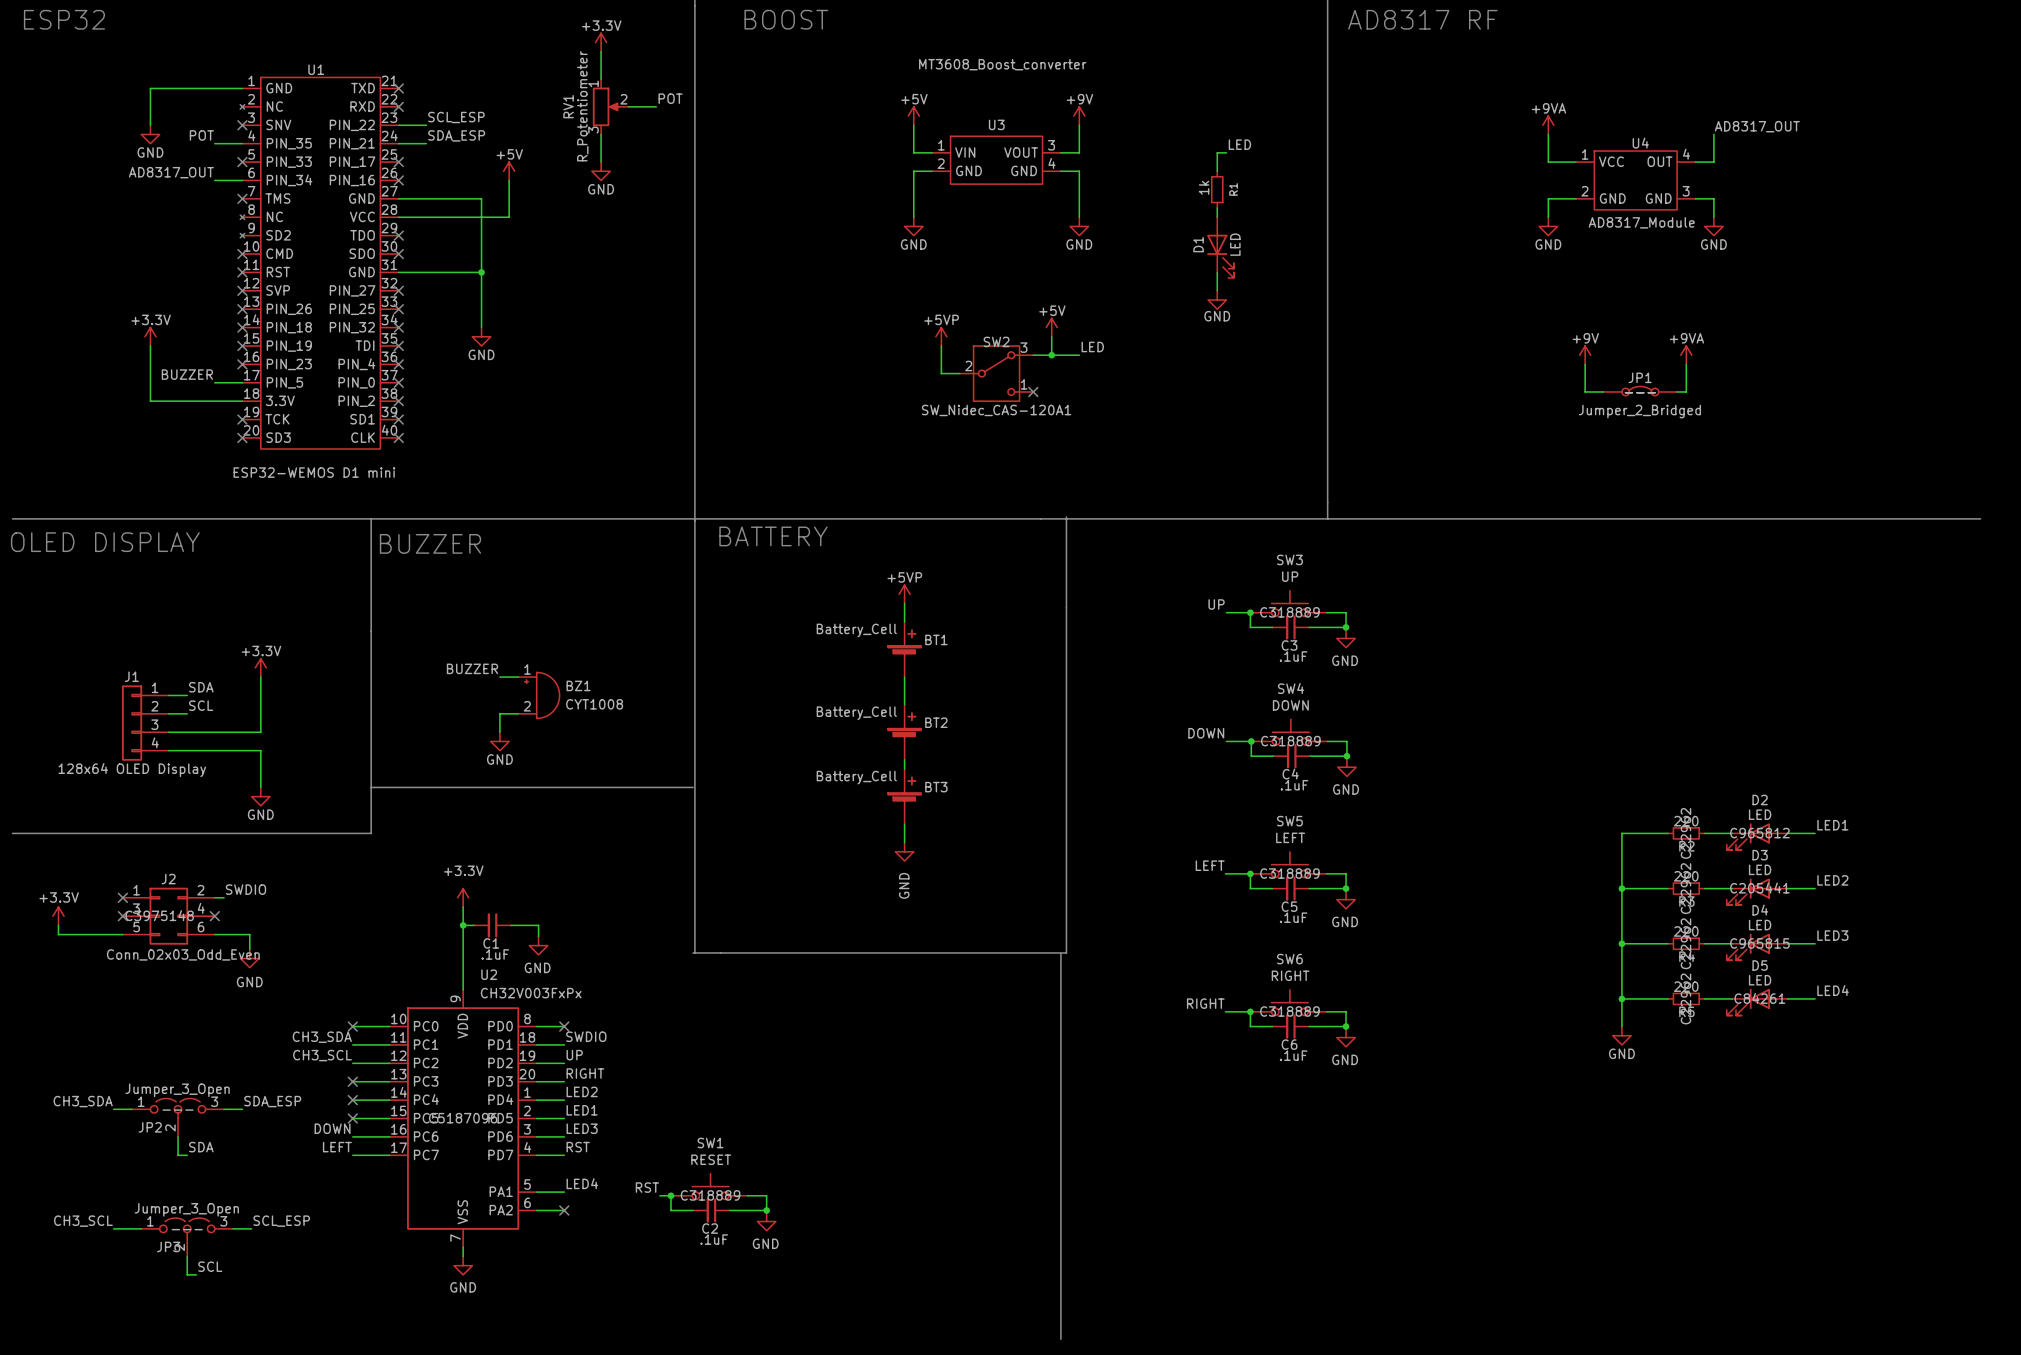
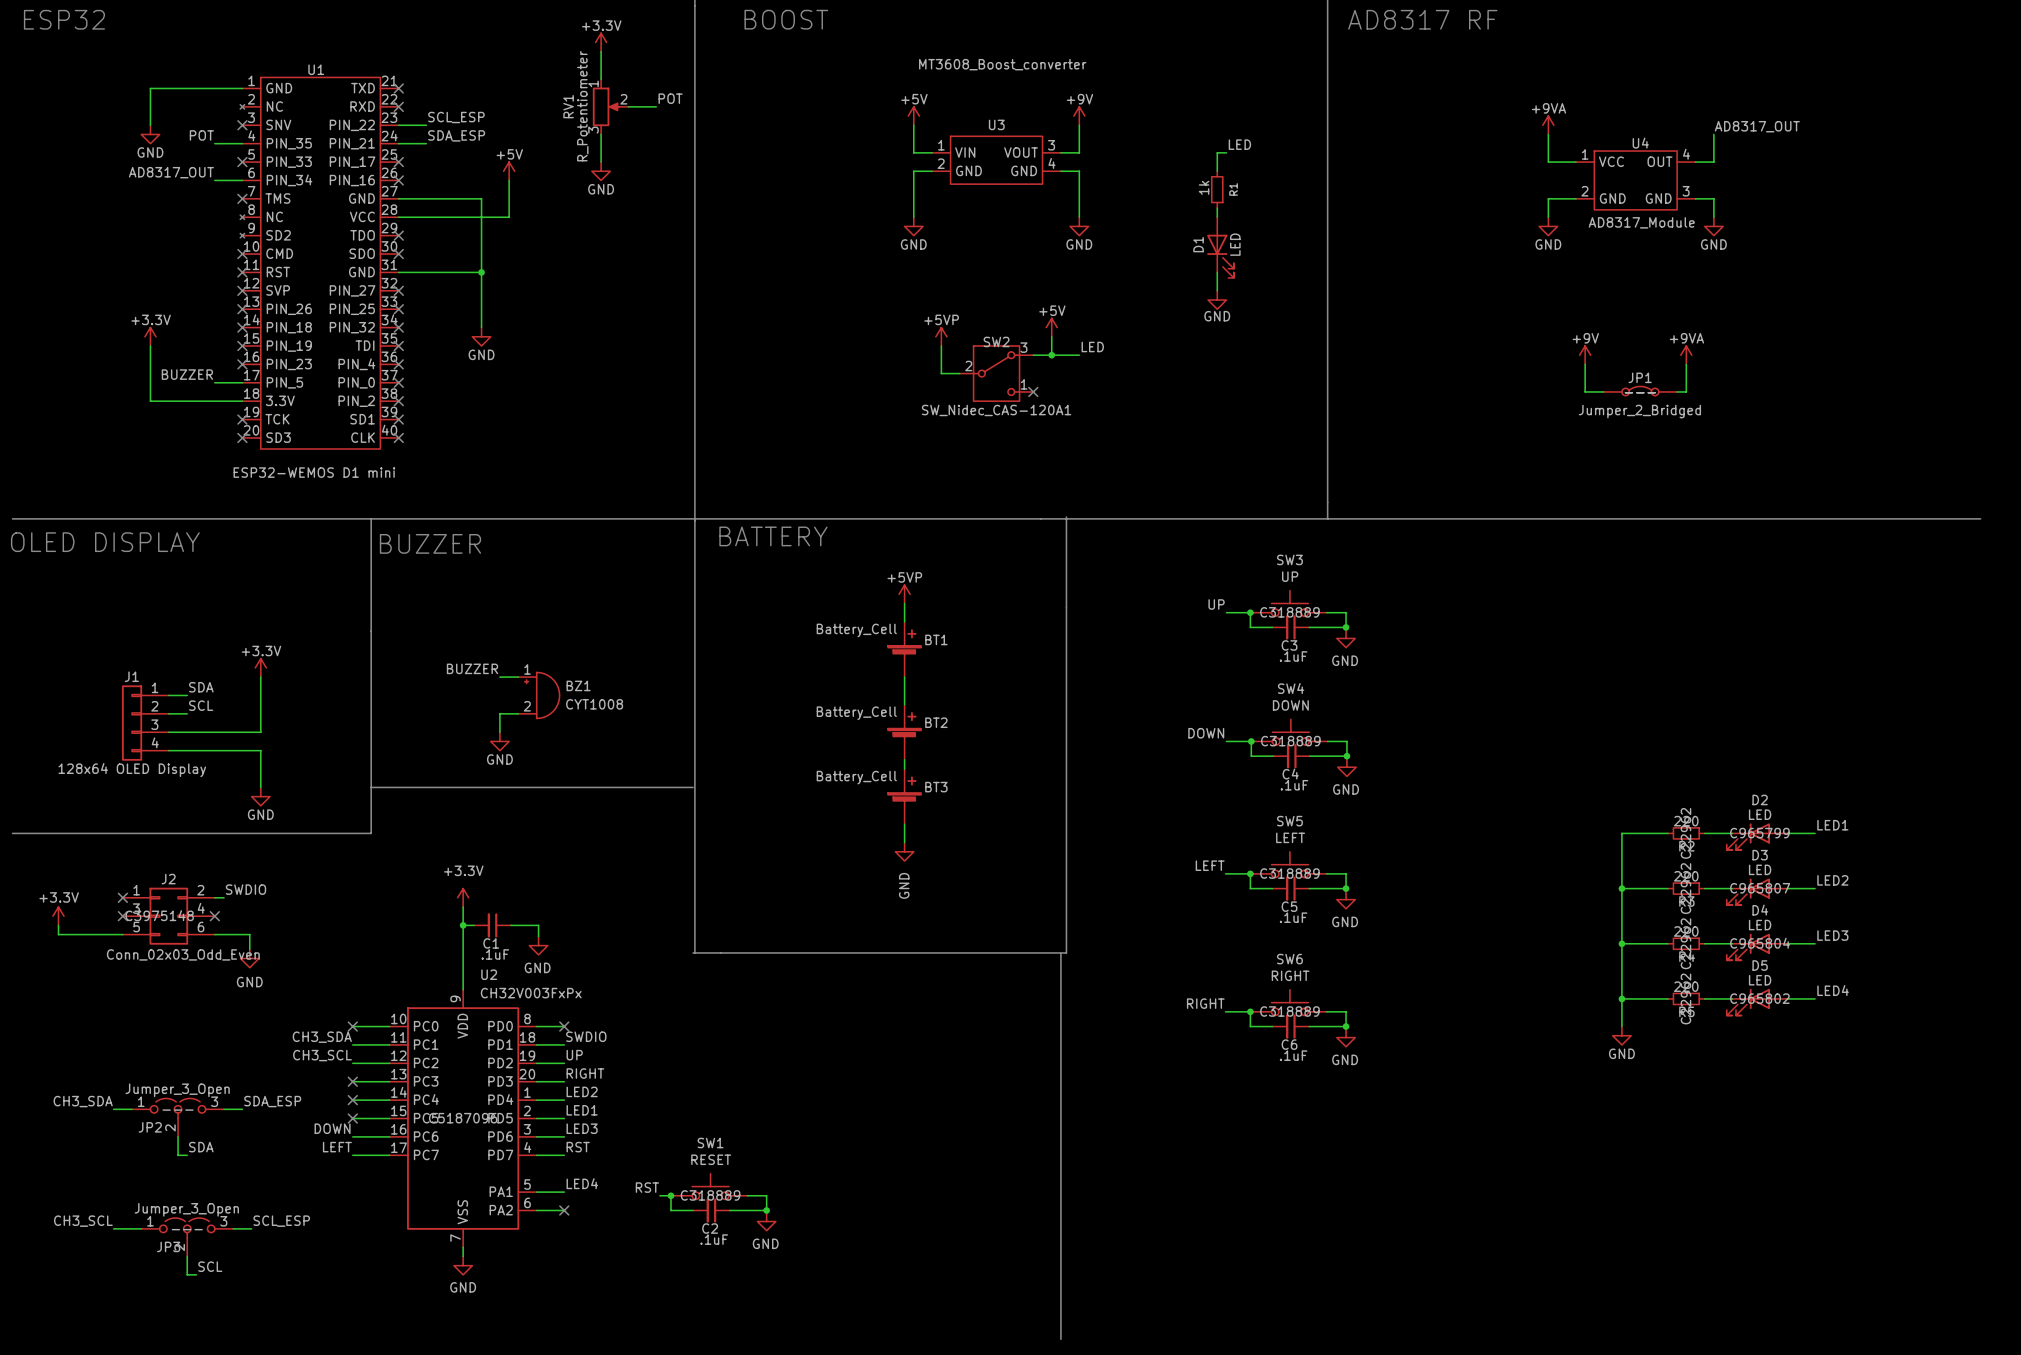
D2 text: C965812 (1759, 833) -> C965799 (1759, 833)
D3 text: C205441 (1759, 888) -> C965807 (1760, 888)
D4 text: C965815 (1759, 943) -> C965804 (1760, 943)
D5 text: C84261 (1759, 998) -> C965802 (1759, 998)

